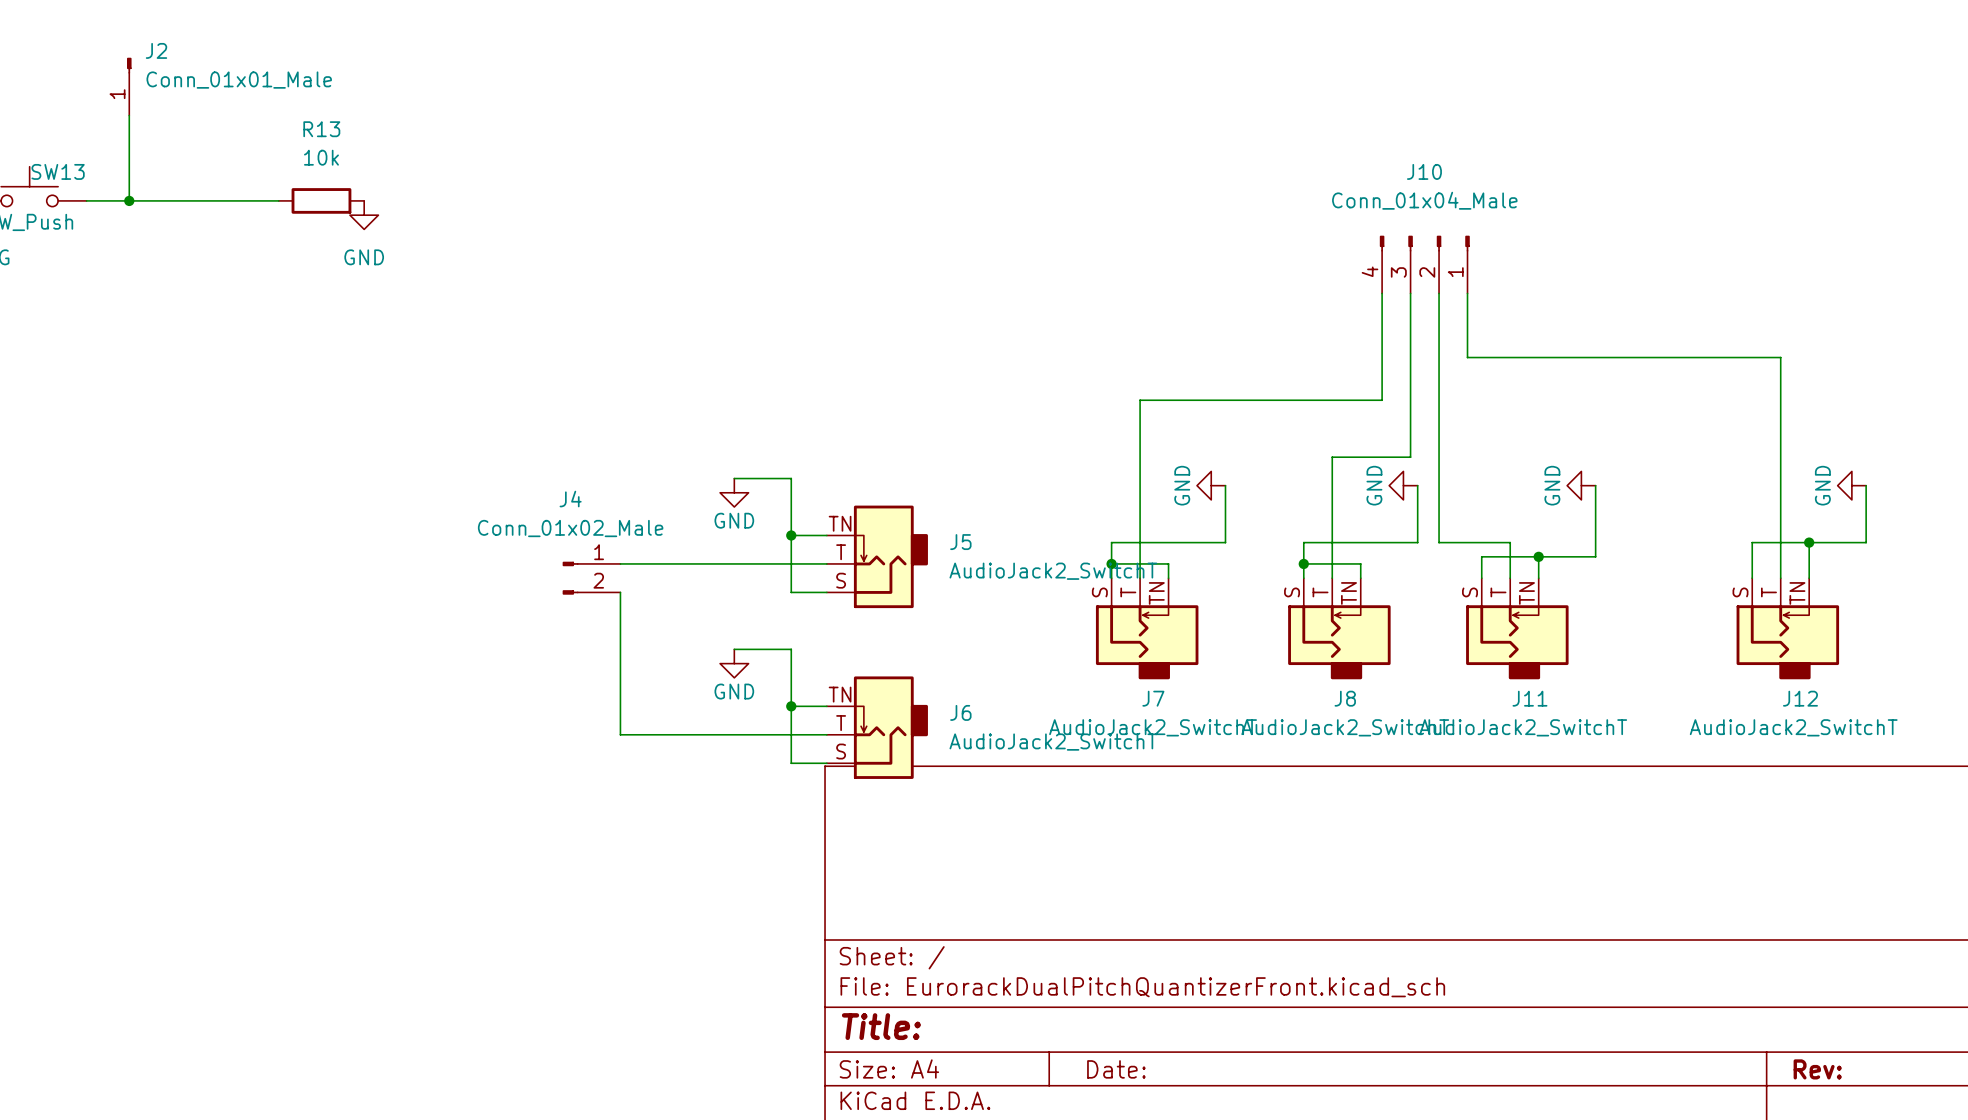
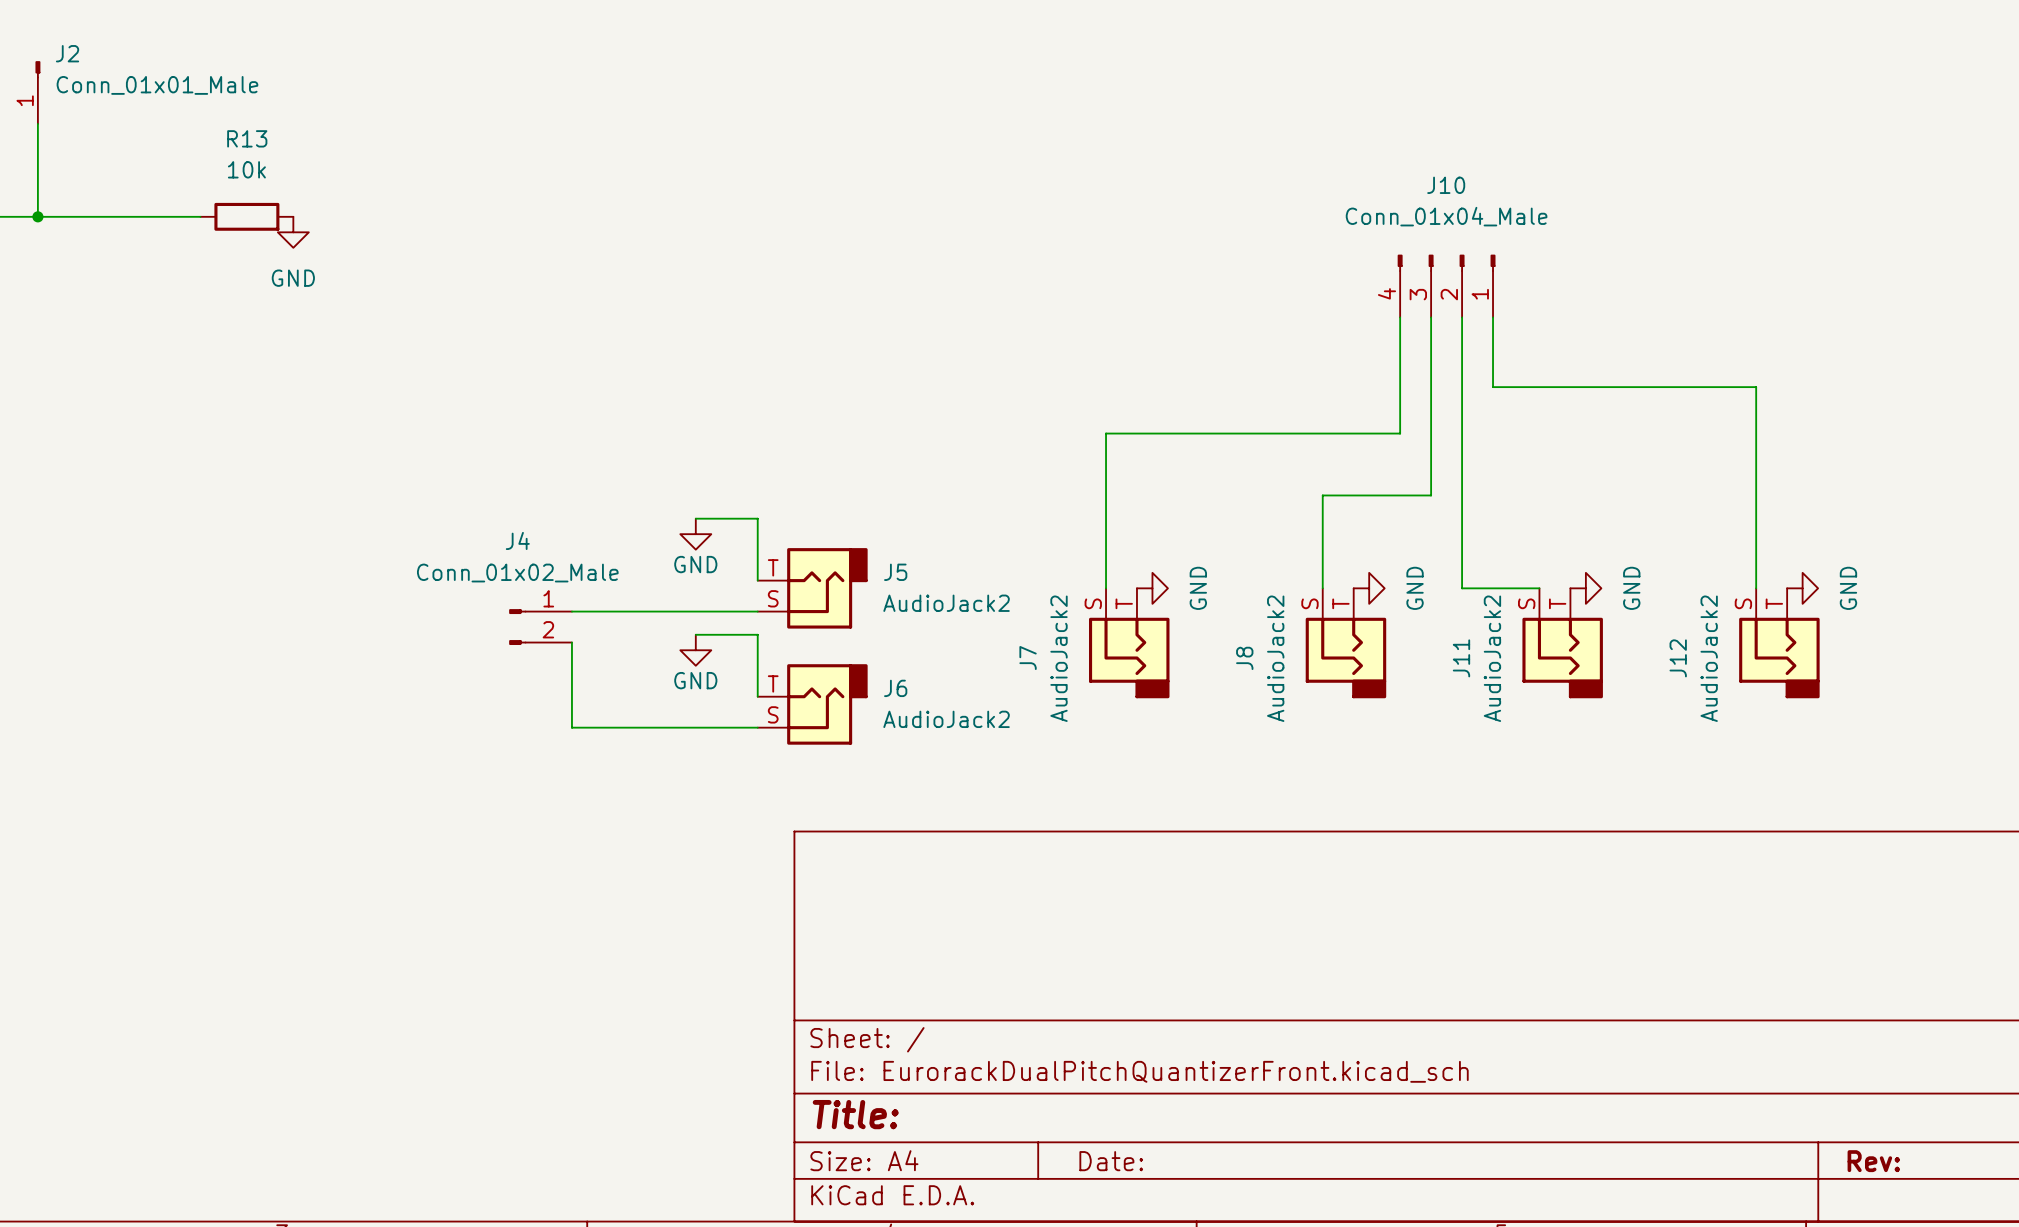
wire: (1709, 357) (1780, 357) (1780, 578) -> (1756, 387) (1756, 588)
wire: (1140, 400) (1140, 578) -> (1136, 433) (1106, 433) (1106, 588)
wire: (1332, 457) (1332, 578) -> (1345, 495) (1322, 495) (1322, 588)
power symbol: GND (1211, 485) -> none
wire: (1225, 485) (1225, 542) (1111, 542) (1111, 578) -> none
power symbol rotation: 0° (1403, 485) -> 180° (1369, 588)
power symbol position: GND (1403, 485) -> GND (1369, 588)
wire: (1417, 485) (1417, 542) (1303, 542) (1303, 578) -> none
power symbol rotation: 0° (1581, 485) -> 180° (1585, 588)
power symbol position: GND (1581, 485) -> GND (1585, 588)
wire: (1595, 485) (1595, 556) (1481, 556) (1481, 578) -> none
power symbol: GND (1851, 485) -> none
wire: (1866, 485) (1866, 542) (1752, 542) (1752, 578) -> none
J5 symbol: [826, 505, 928, 609] -> [757, 548, 868, 629]
junction: (791, 535) -> none
wire: (826, 535) (791, 535) (791, 585) -> (695, 634) (757, 634)
power symbol: none -> GND (1152, 588)
power symbol: none -> GND (1802, 588)
wire: (1809, 542) (1809, 578) -> none
junction: (1809, 542) -> none
junction: (1538, 556) -> none
wire: (1111, 563) (1168, 563) (1168, 578) -> none
junction: (1111, 563) -> none
wire: (1303, 563) (1360, 563) (1360, 578) -> none
junction: (1303, 563) -> none
J5 value: AudioJack2_SwitchT (1053, 571) -> AudioJack2 (946, 603)
J7 symbol: [1095, 578, 1199, 680] -> [1089, 588, 1170, 699]
J8 symbol: [1288, 578, 1391, 680] -> [1305, 588, 1387, 699]
J11 symbol: [1466, 578, 1569, 680] -> [1522, 588, 1603, 699]
J12 symbol: [1736, 578, 1840, 680] -> [1739, 588, 1820, 699]
wire: (791, 592) (826, 592) -> (757, 642) (757, 696)
wire: (734, 649) (791, 649) (791, 763) (826, 763) -> none
power symbol position: GND (734, 663) -> GND (695, 650)
wire: (620, 670) (620, 734) (826, 734) -> (571, 727) (757, 727)
J6 symbol: [826, 676, 928, 779] -> [757, 664, 868, 745]
J7 name position: J7 (1153, 698) -> J7 (1028, 658)
J8 name position: J8 (1345, 698) -> J8 (1244, 658)
J11 name position: J11 (1529, 698) -> J11 (1461, 658)
J12 name position: J12 (1800, 698) -> J12 (1678, 658)
wire: (791, 706) (826, 706) -> none
junction: (791, 706) -> none
J7 value: AudioJack2_SwitchT (1153, 727) -> AudioJack2 (1059, 658)
J8 value: AudioJack2_SwitchT (1345, 727) -> AudioJack2 (1275, 658)
J11 value: AudioJack2_SwitchT (1523, 727) -> AudioJack2 (1492, 658)
J12 value: AudioJack2_SwitchT (1793, 727) -> AudioJack2 (1709, 658)
J6 value: AudioJack2_SwitchT (1053, 742) -> AudioJack2 (946, 719)

